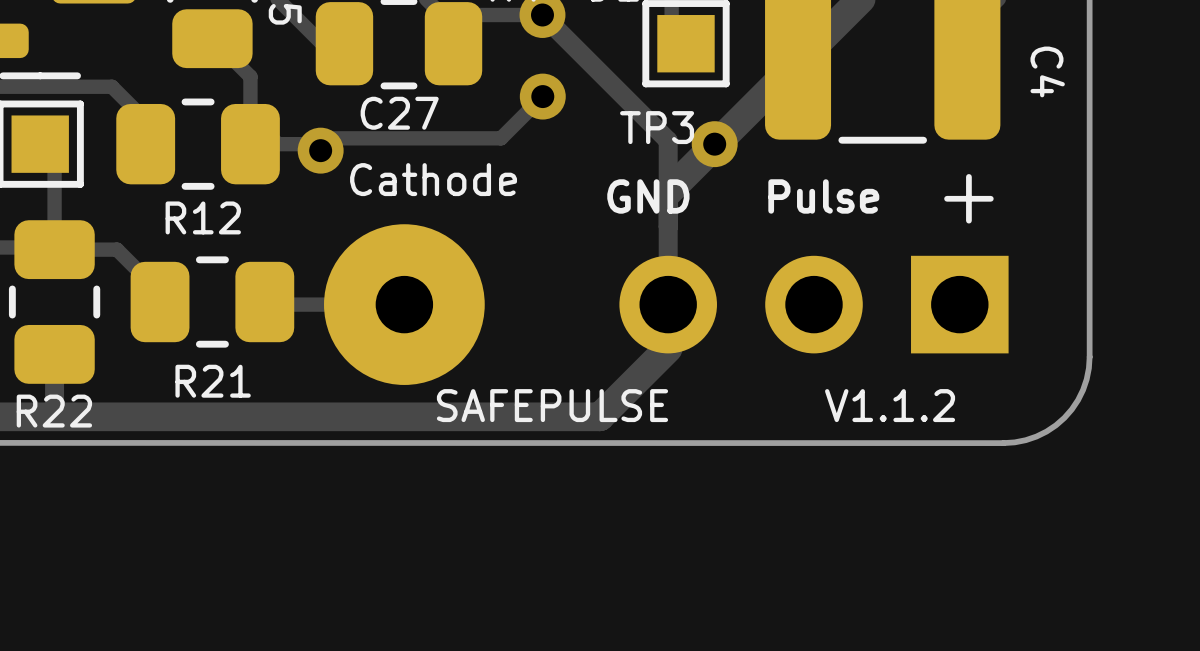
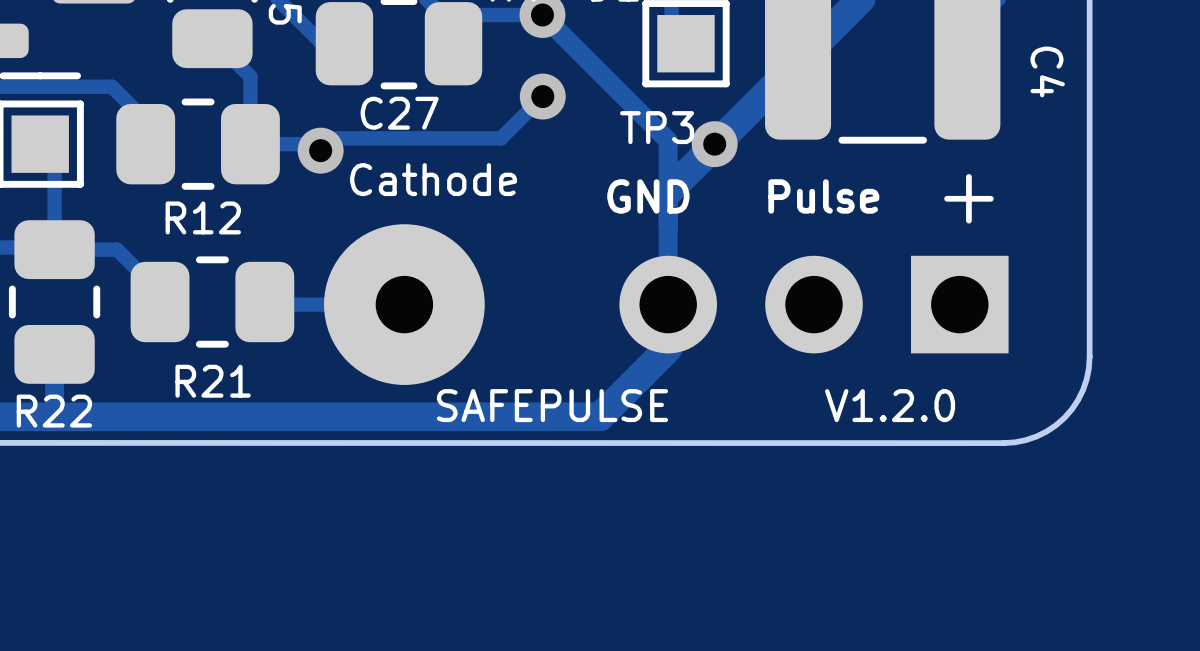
text: SAFEPULSE V1.1.2 (695, 405) -> SAFEPULSE V1.2.0 (695, 405)

